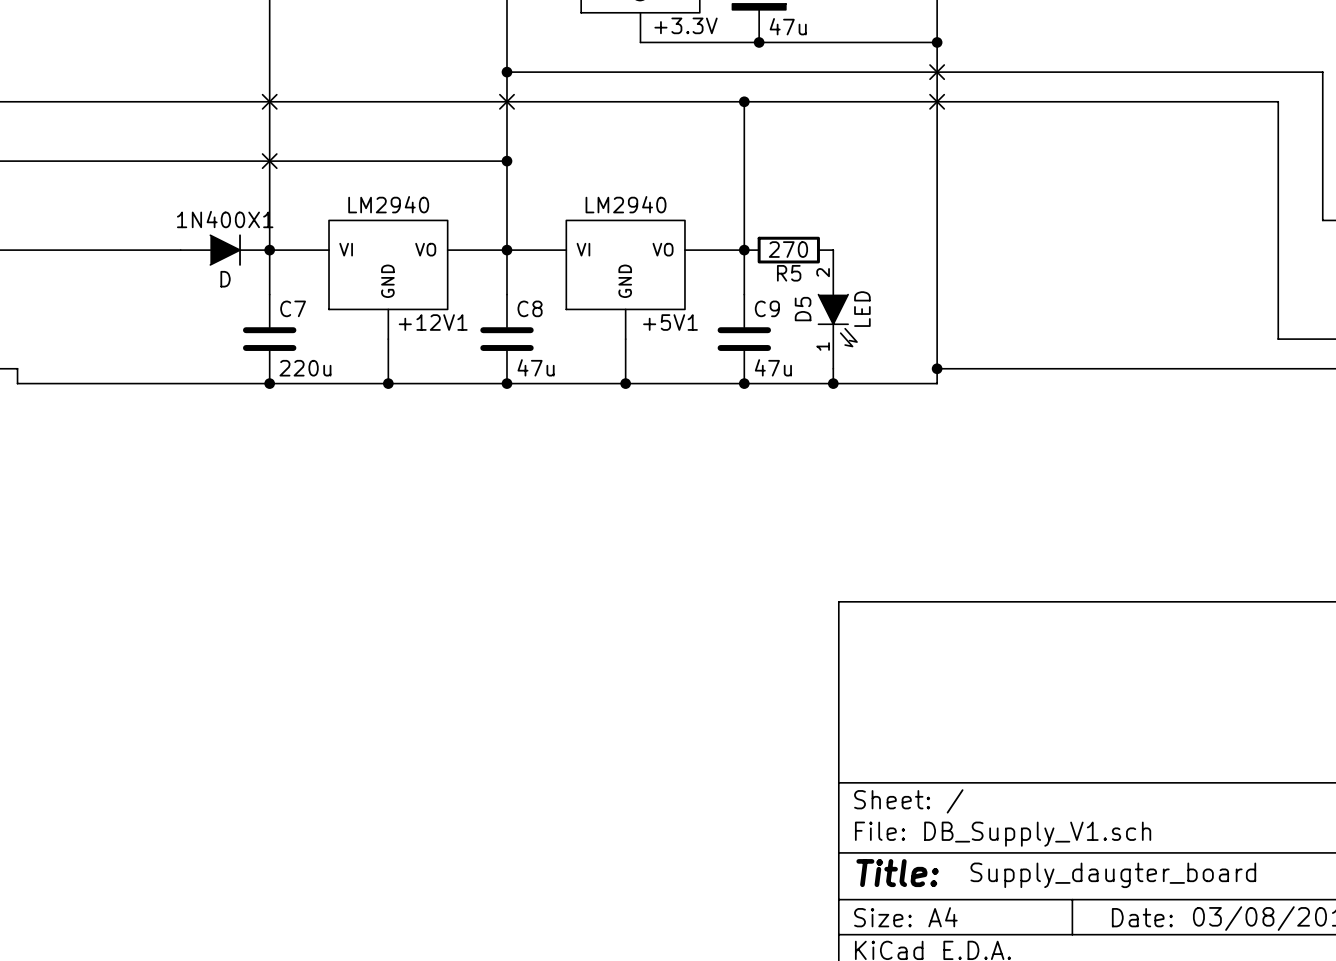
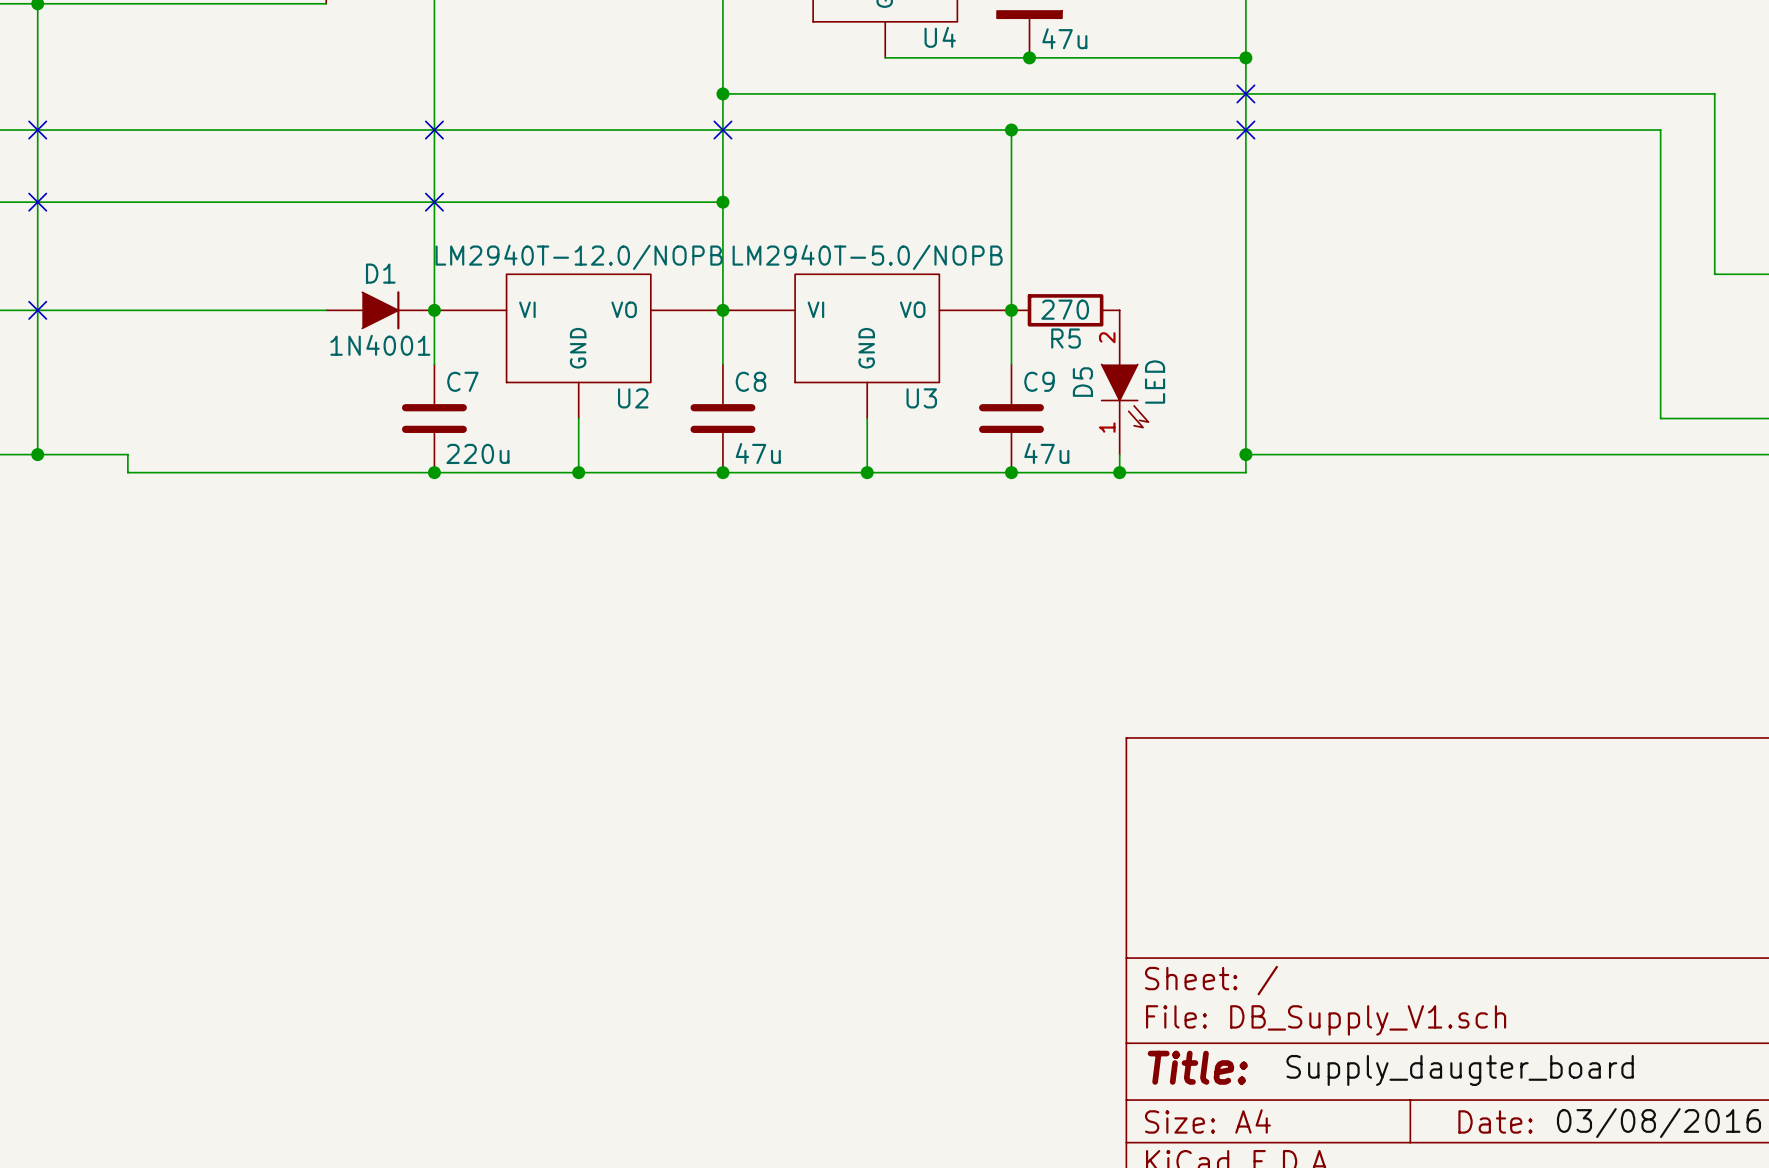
+3.3V name: +3.3V (686, 25) -> U4 (940, 37)
+12V1 value: LM2940 (388, 204) -> LM2940T-12.0/NOPB (579, 257)
+5V1 value: LM2940 (626, 204) -> LM2940T-5.0/NOPB (867, 257)
1N400X1 name: 1N400X1 (225, 219) -> D1 (380, 273)
1N400X1 value: D (225, 279) -> 1N4001 (380, 345)
+12V1 name: +12V1 (433, 322) -> U2 (633, 398)
+5V1 name: +5V1 (670, 322) -> U3 (921, 398)

